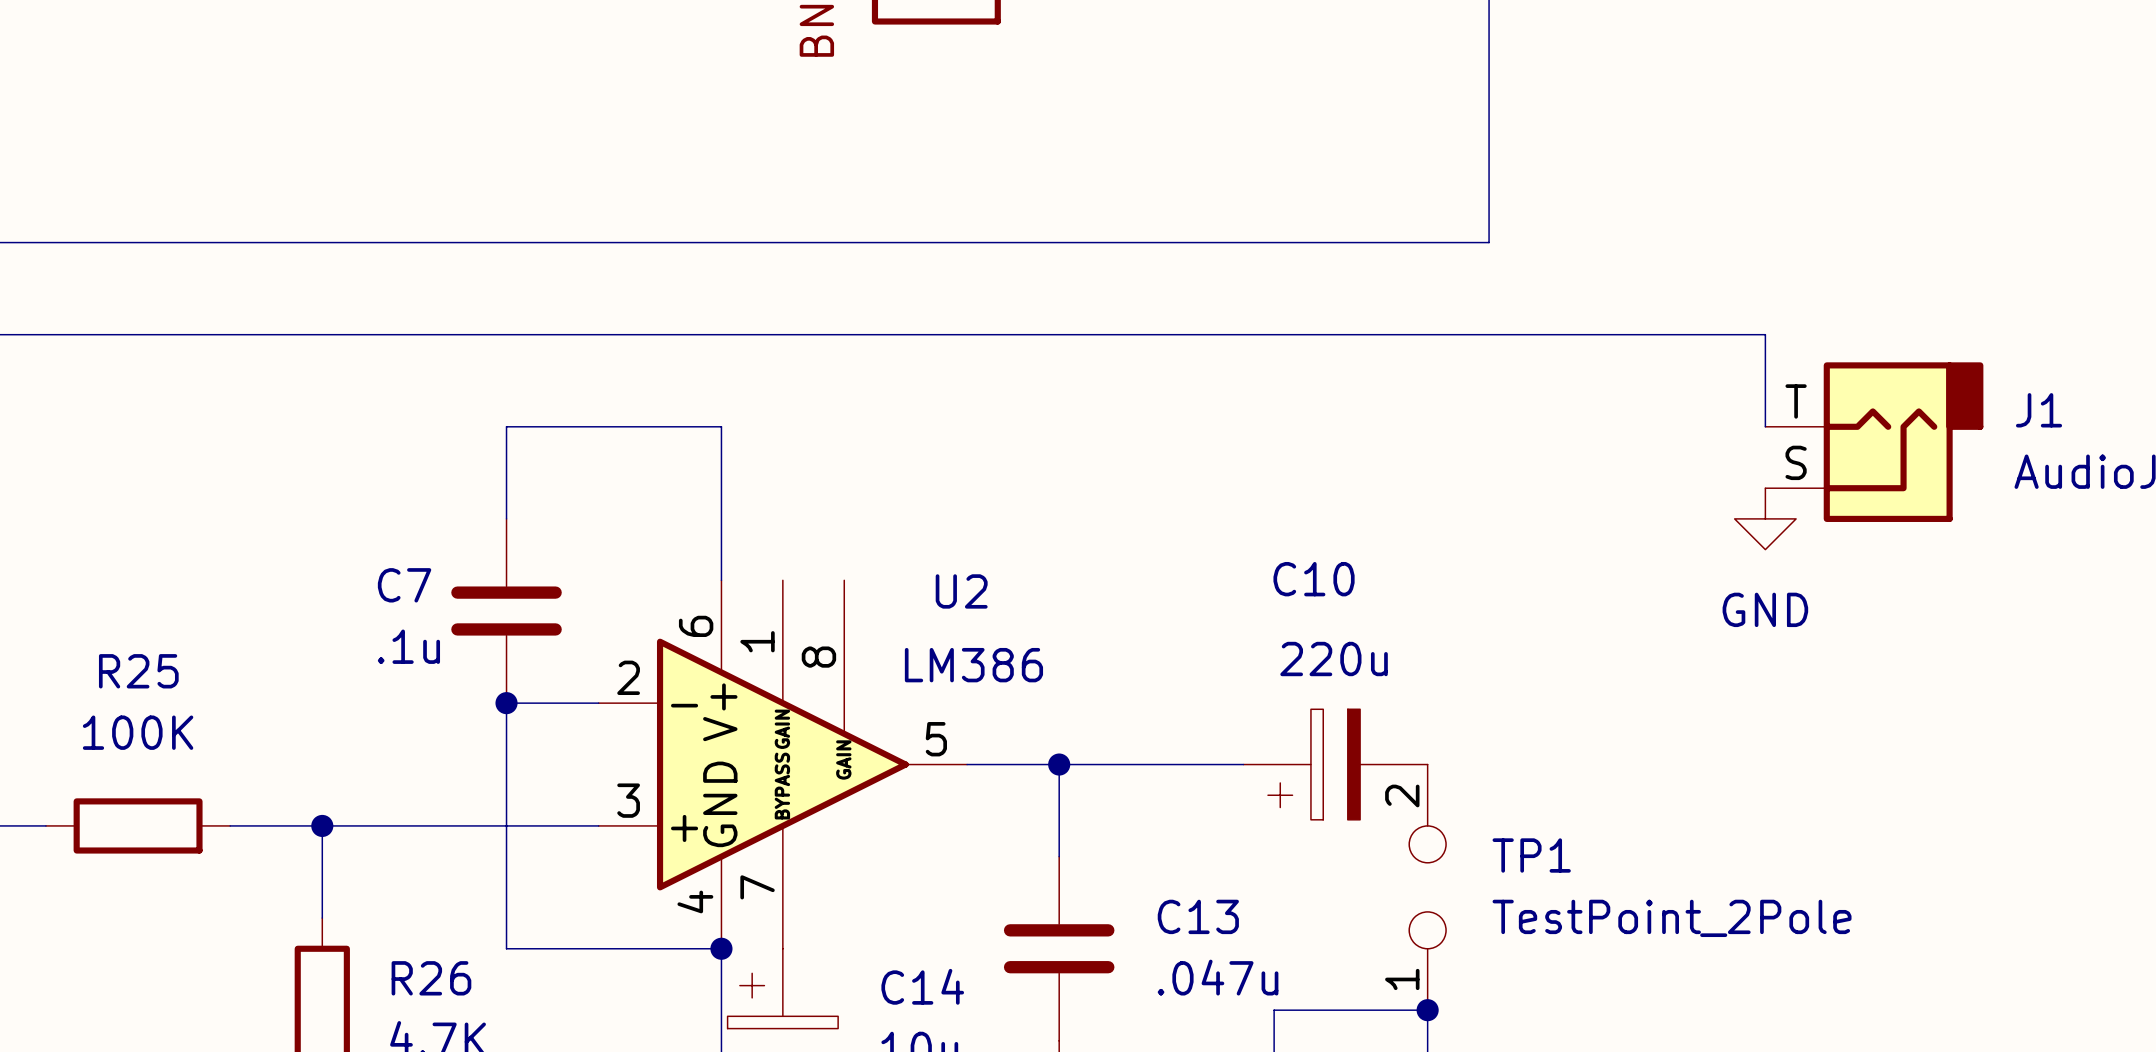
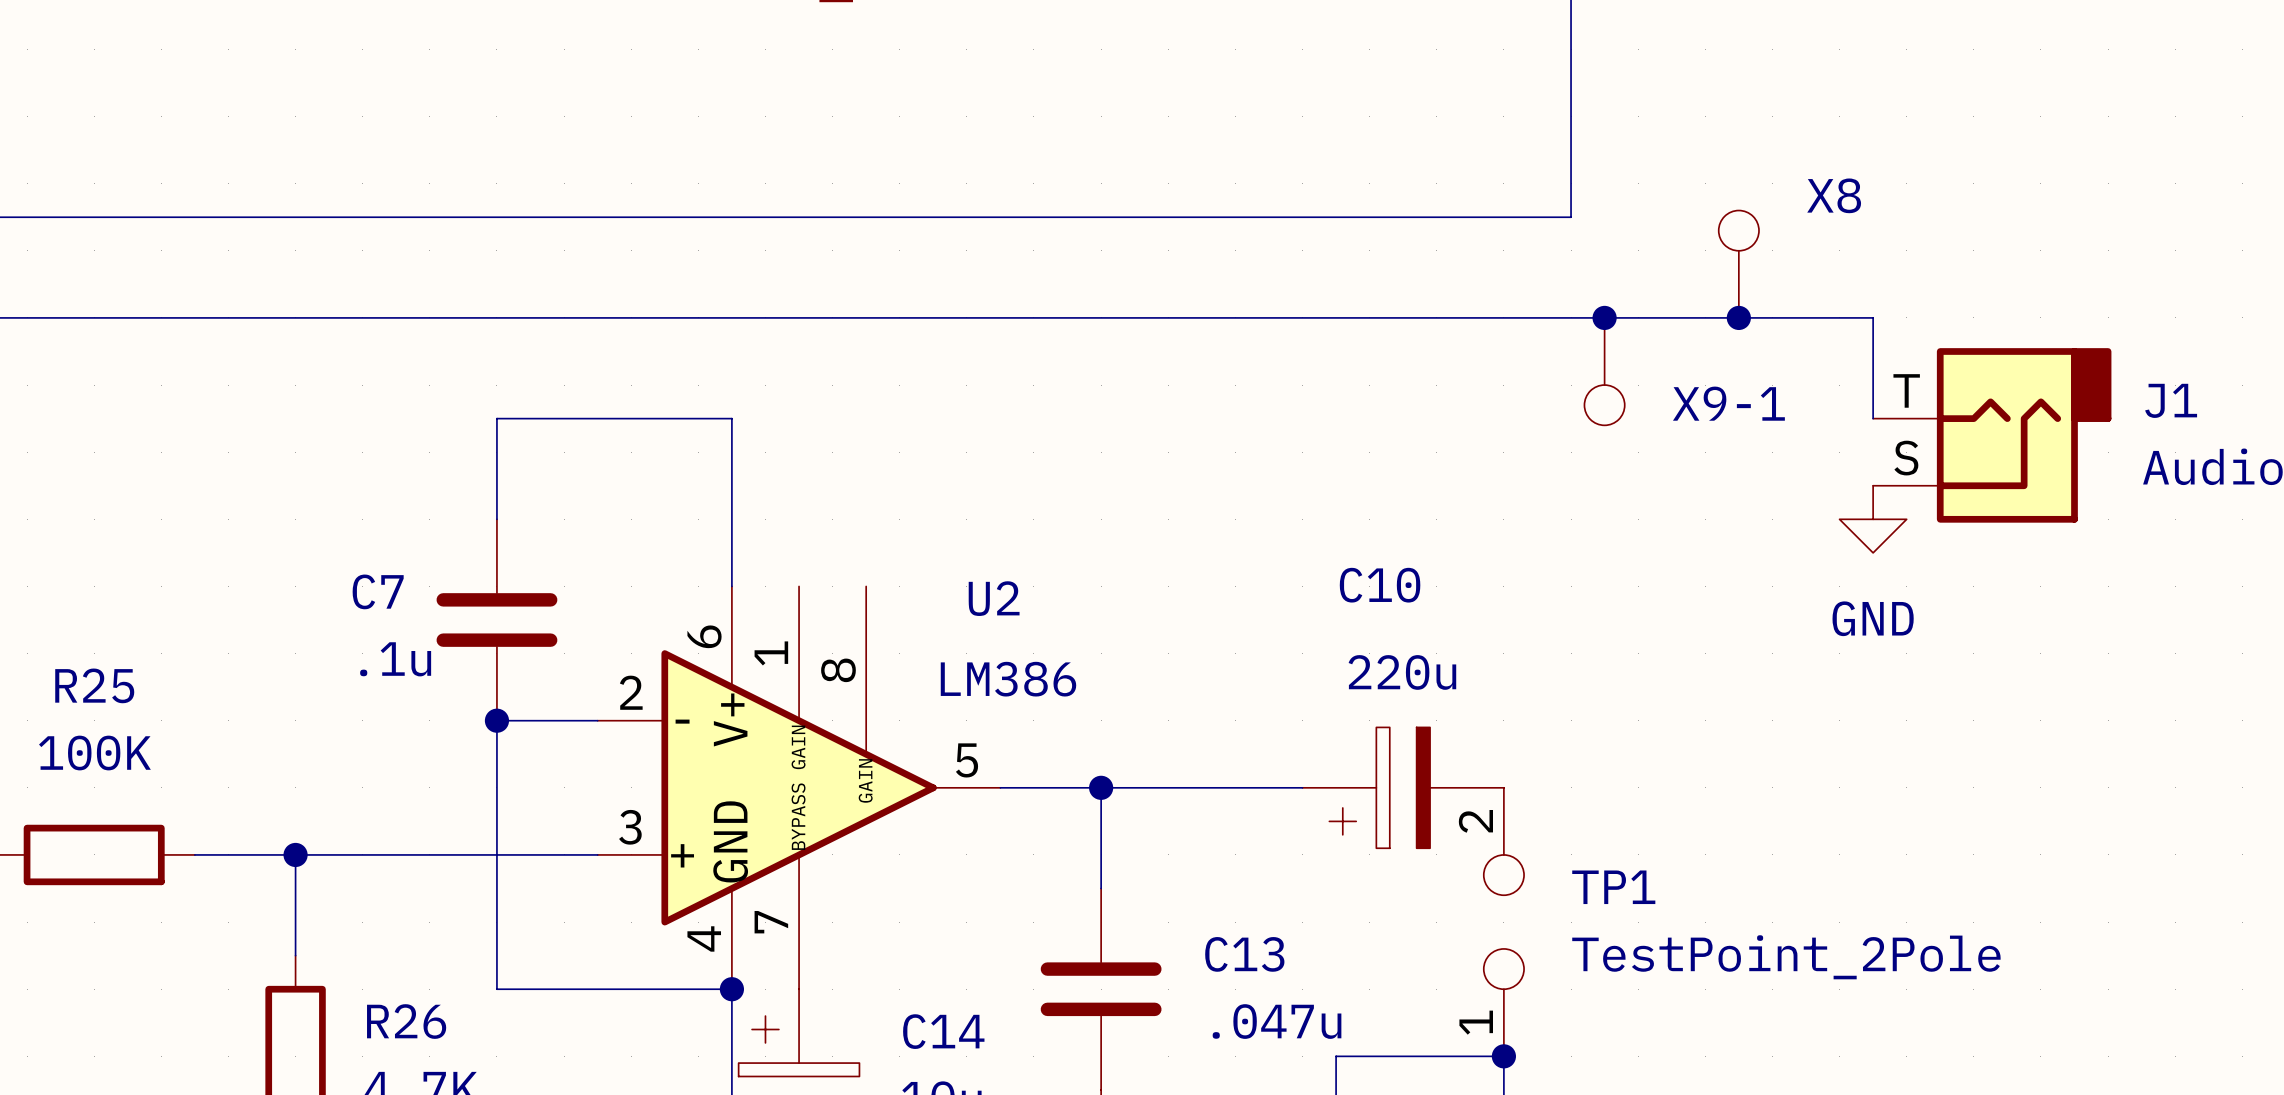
X8: none -> (1738, 264)
junction: none -> (1604, 317)
junction: none -> (1738, 317)
X9-1: none -> (1604, 371)

